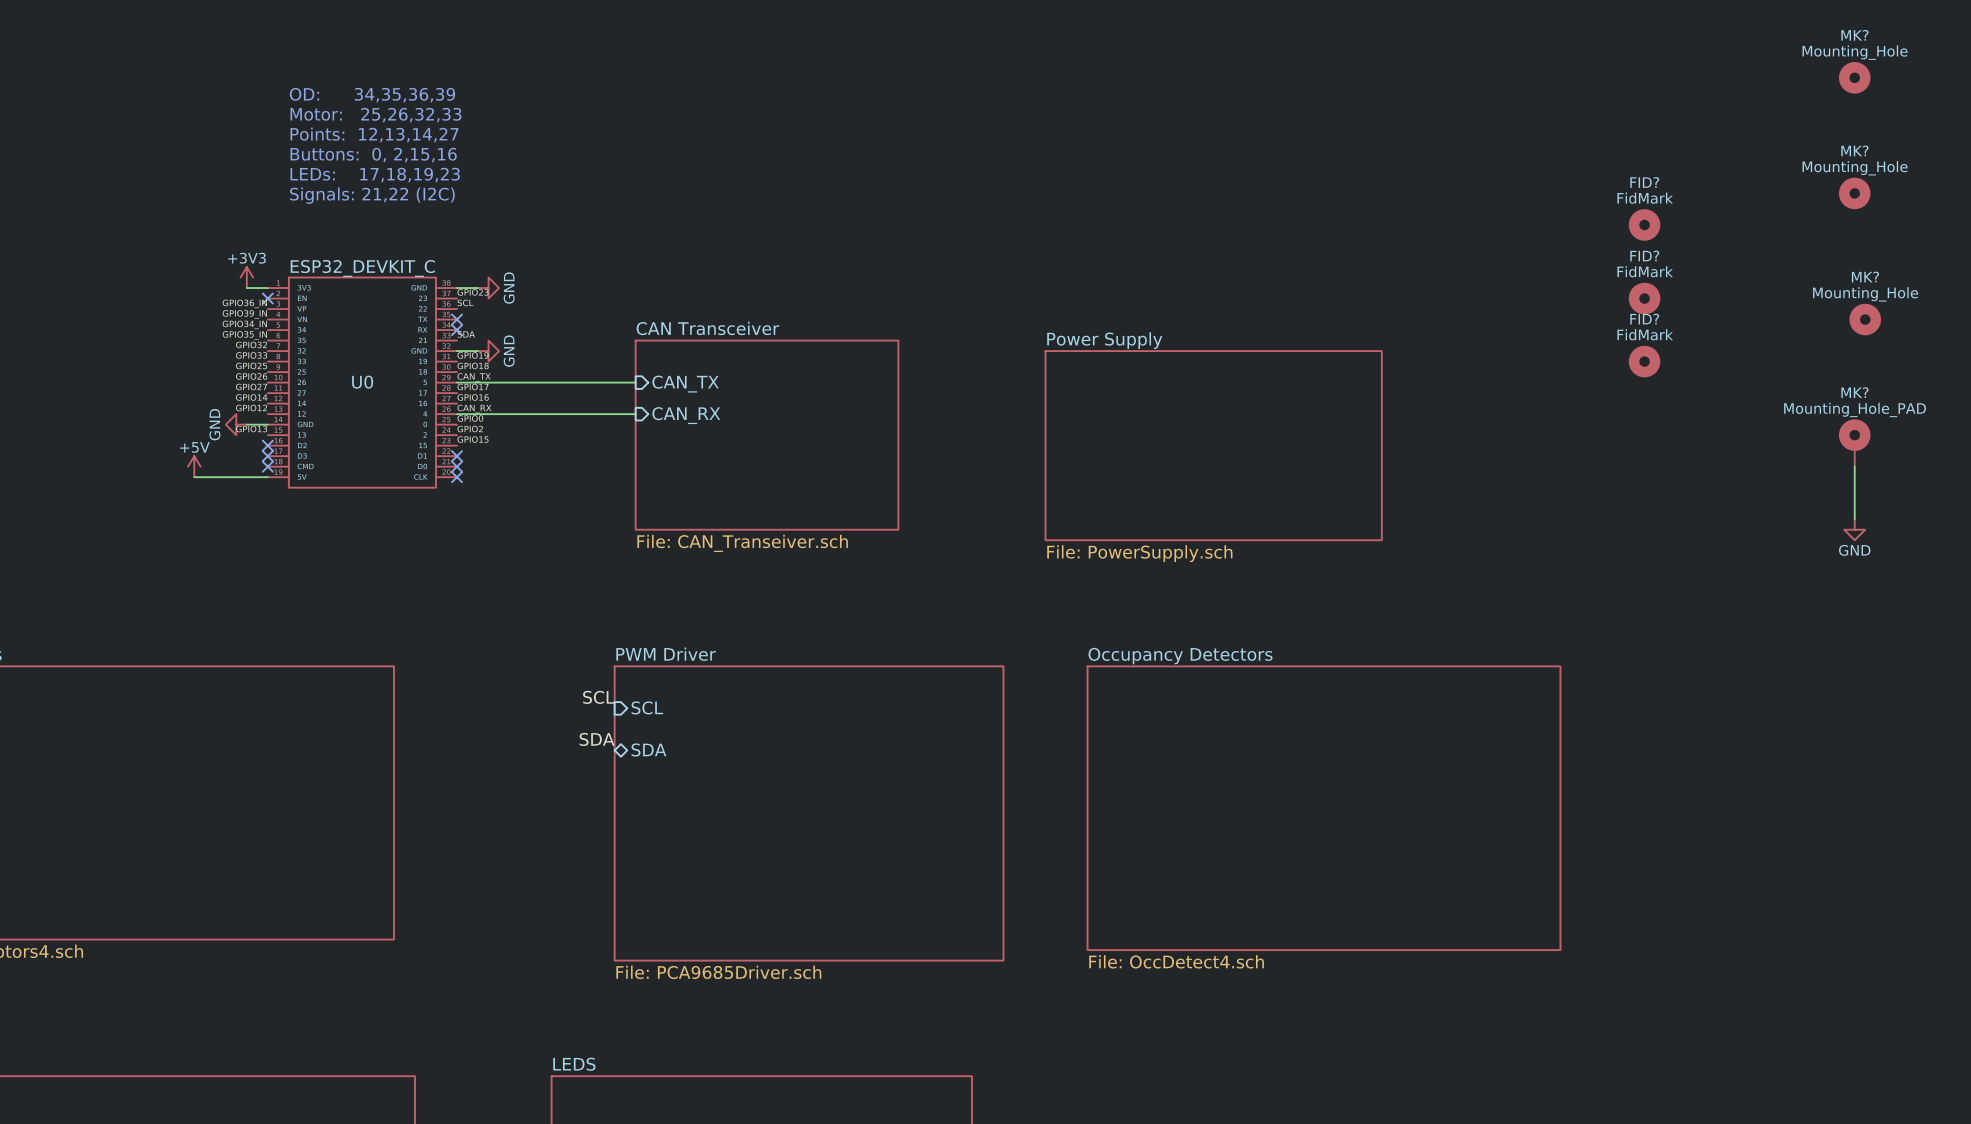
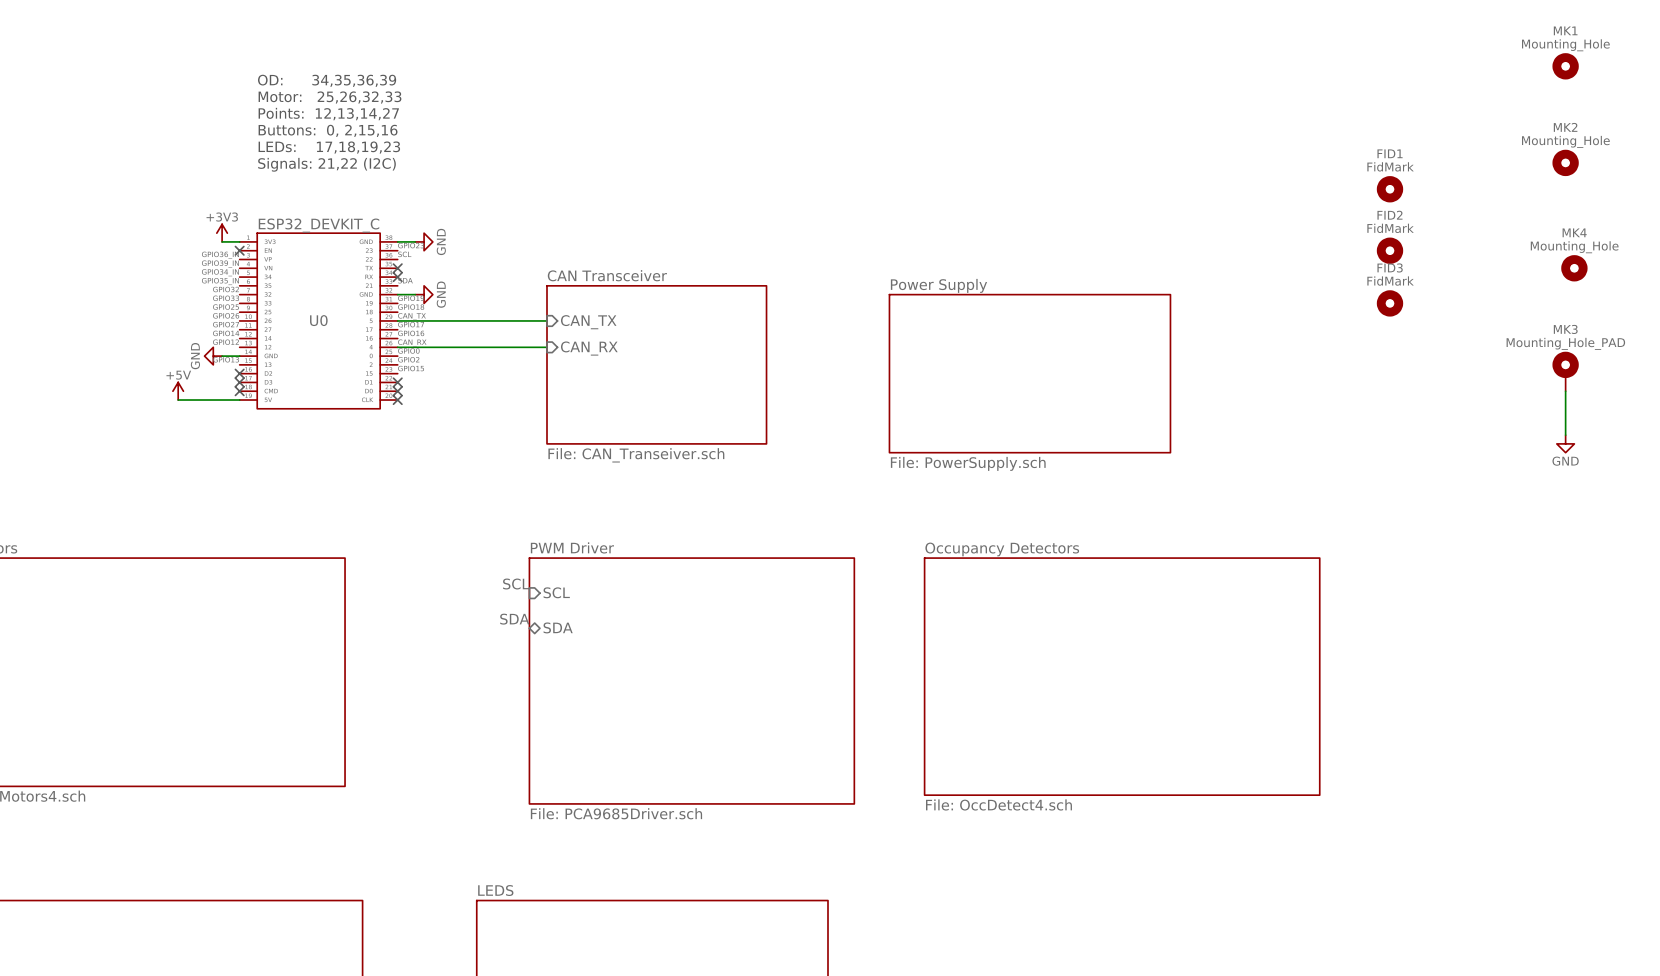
MK? name: MK? (1854, 35) -> MK1 (1565, 30)
MK? name: MK? (1854, 150) -> MK2 (1565, 127)
FID? name: FID? (1644, 182) -> FID1 (1390, 153)
FID? name: FID? (1644, 256) -> FID2 (1389, 215)
MK? name: MK? (1865, 277) -> MK4 (1574, 232)
FID? name: FID? (1644, 319) -> FID3 (1390, 267)
MK? name: MK? (1854, 392) -> MK3 (1565, 329)

